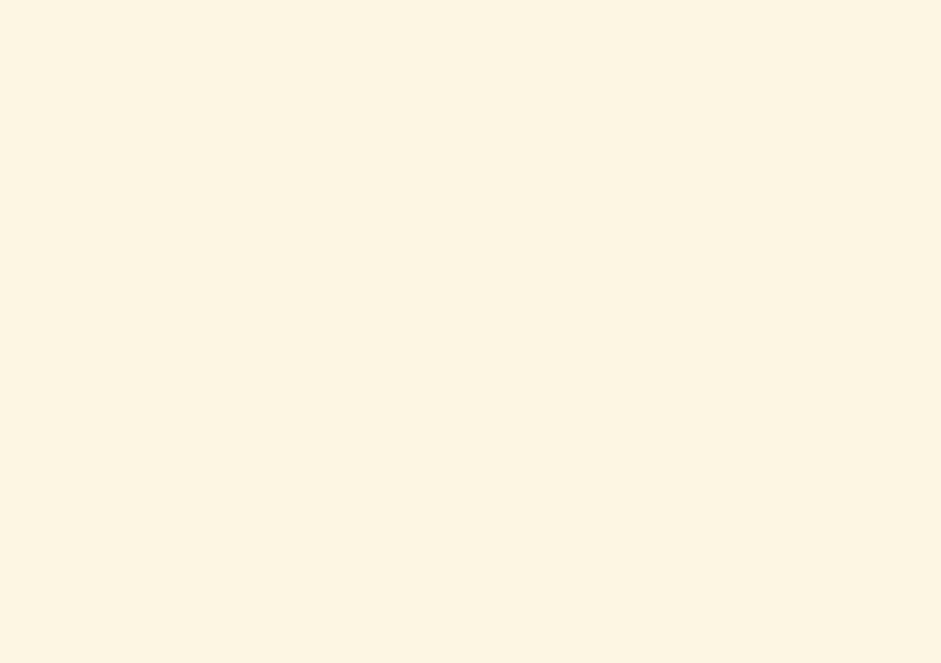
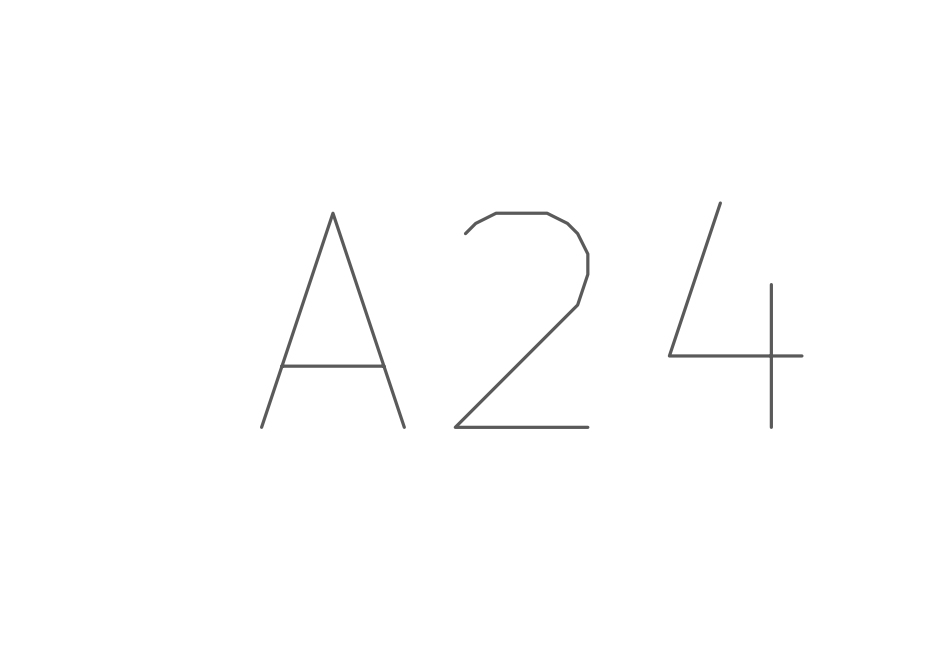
text: none -> A24 (531, 315)

